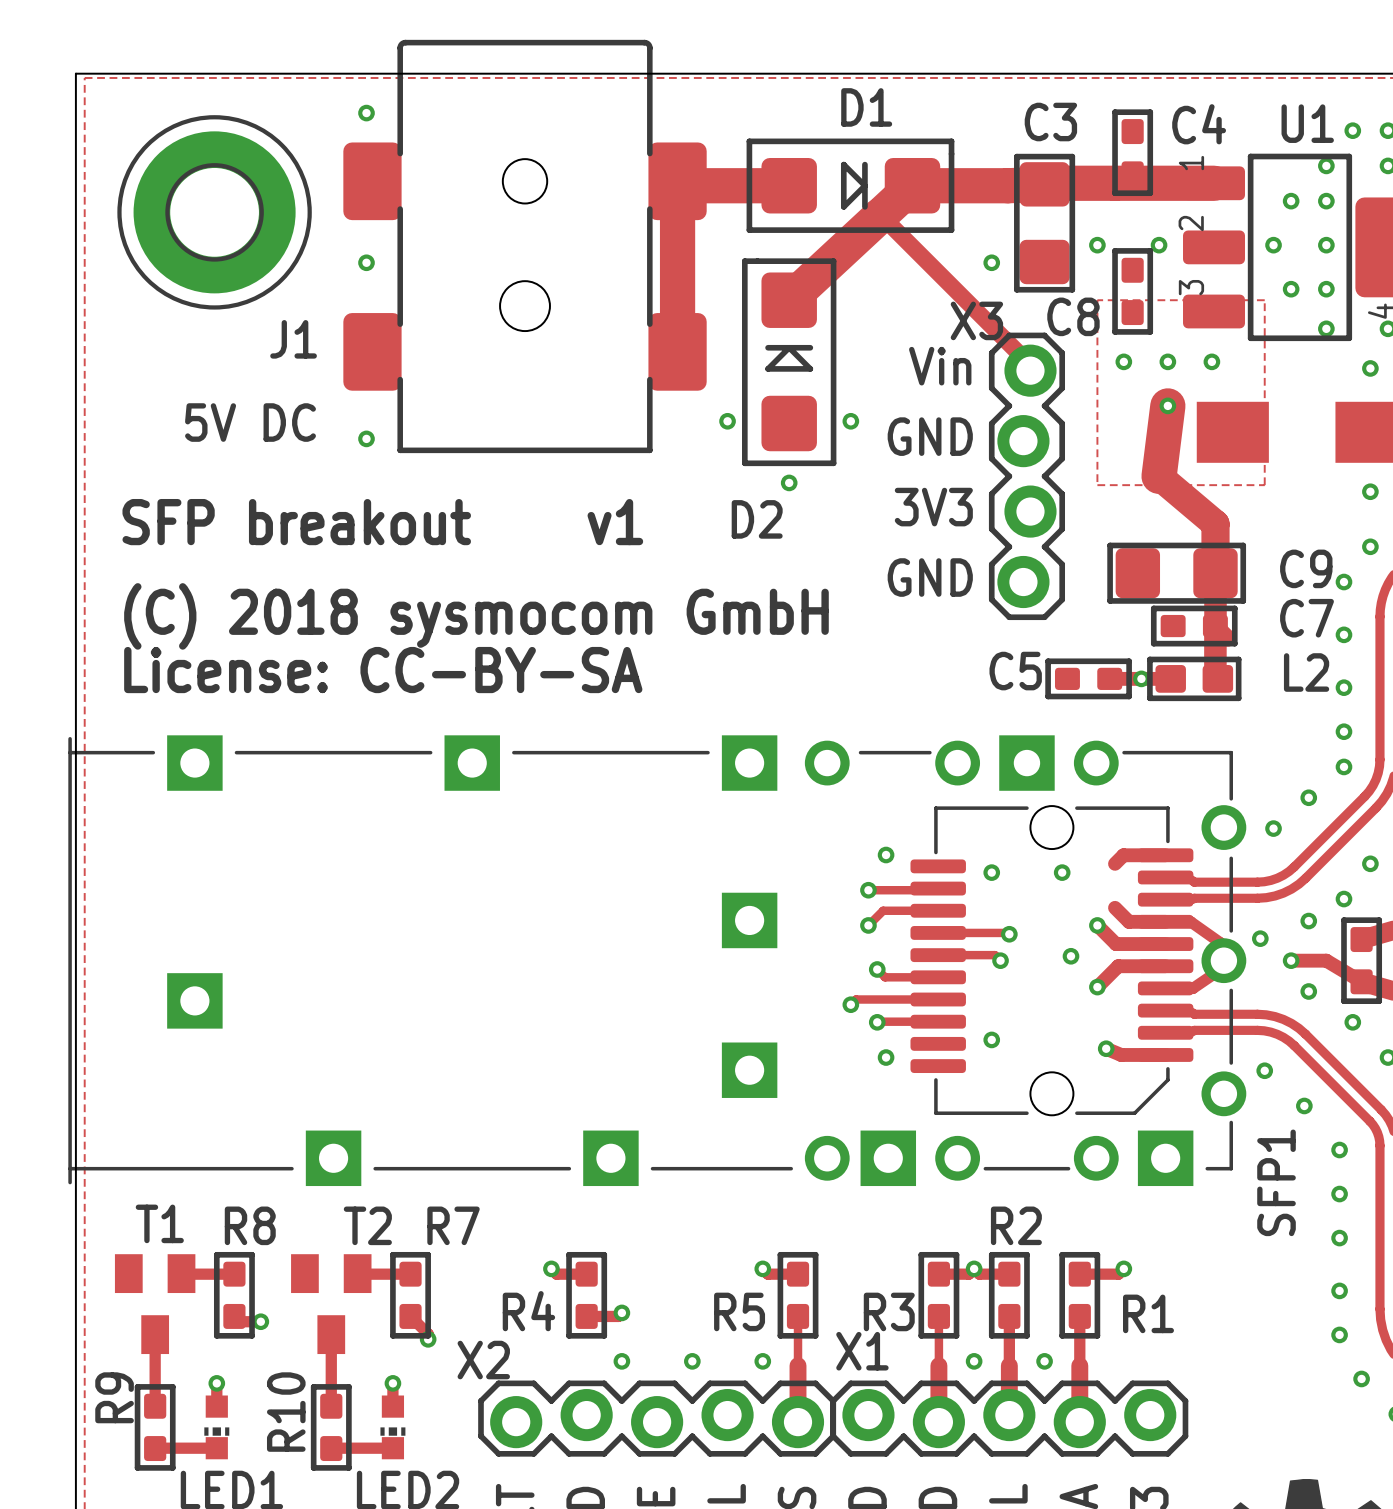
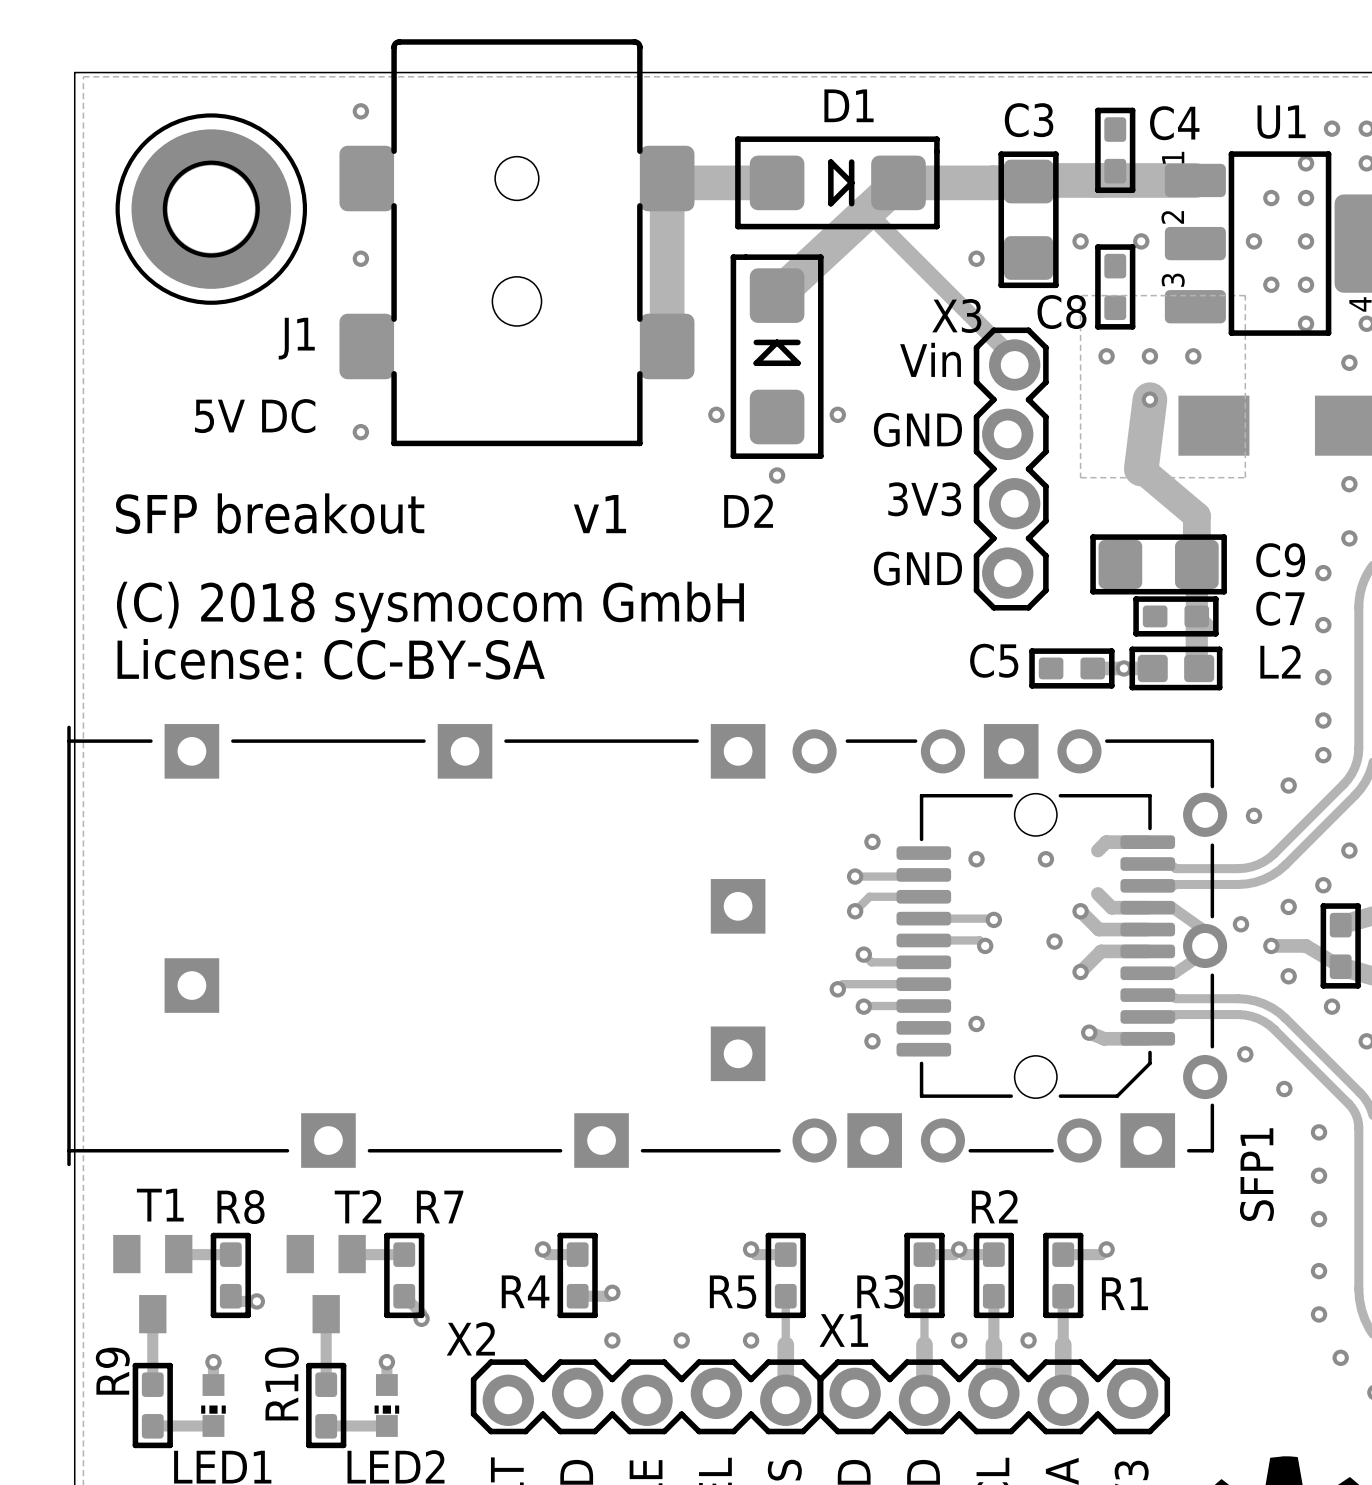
J1 footprint: [343, 39, 707, 454] -> [339, 39, 695, 447]

